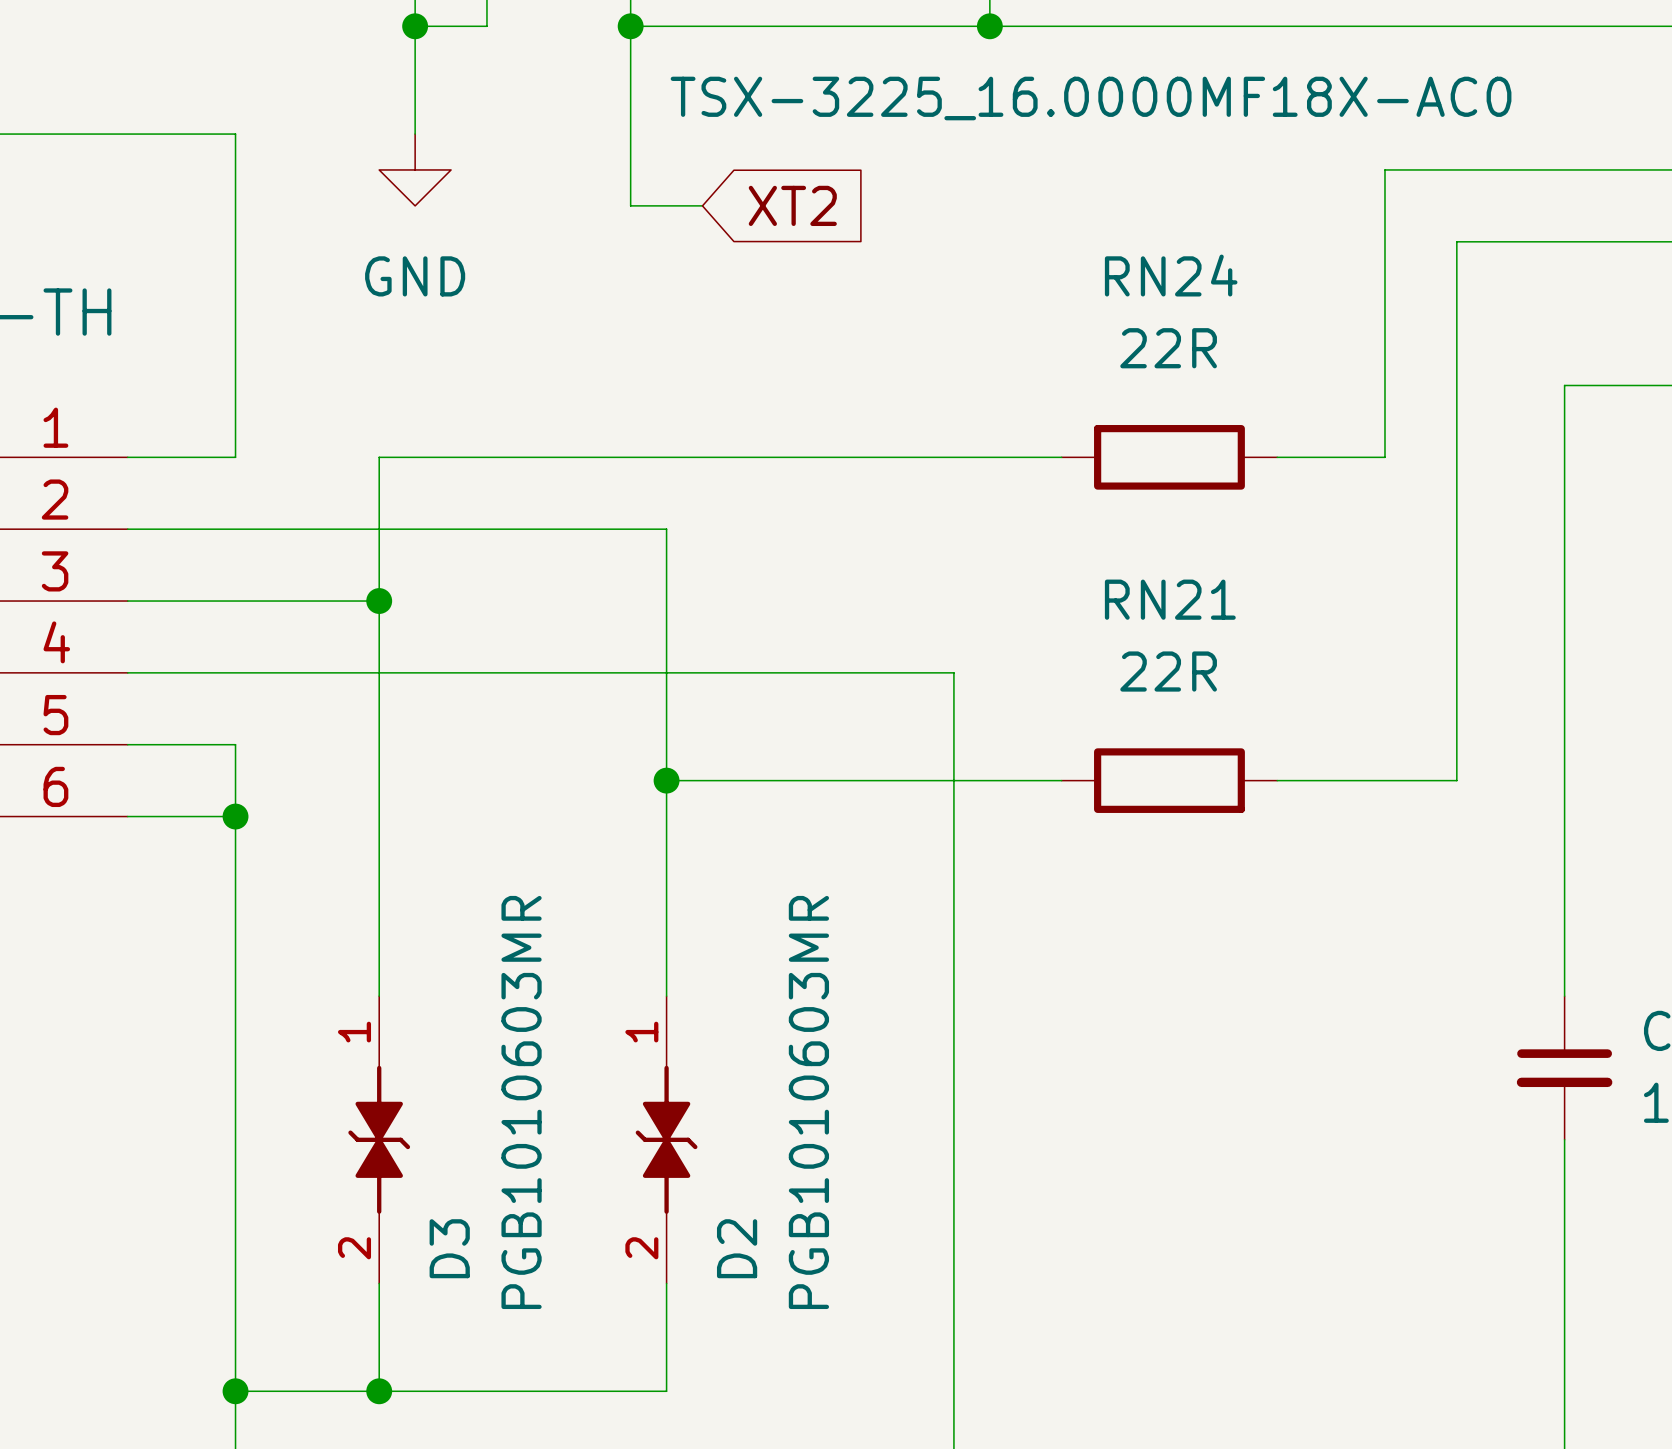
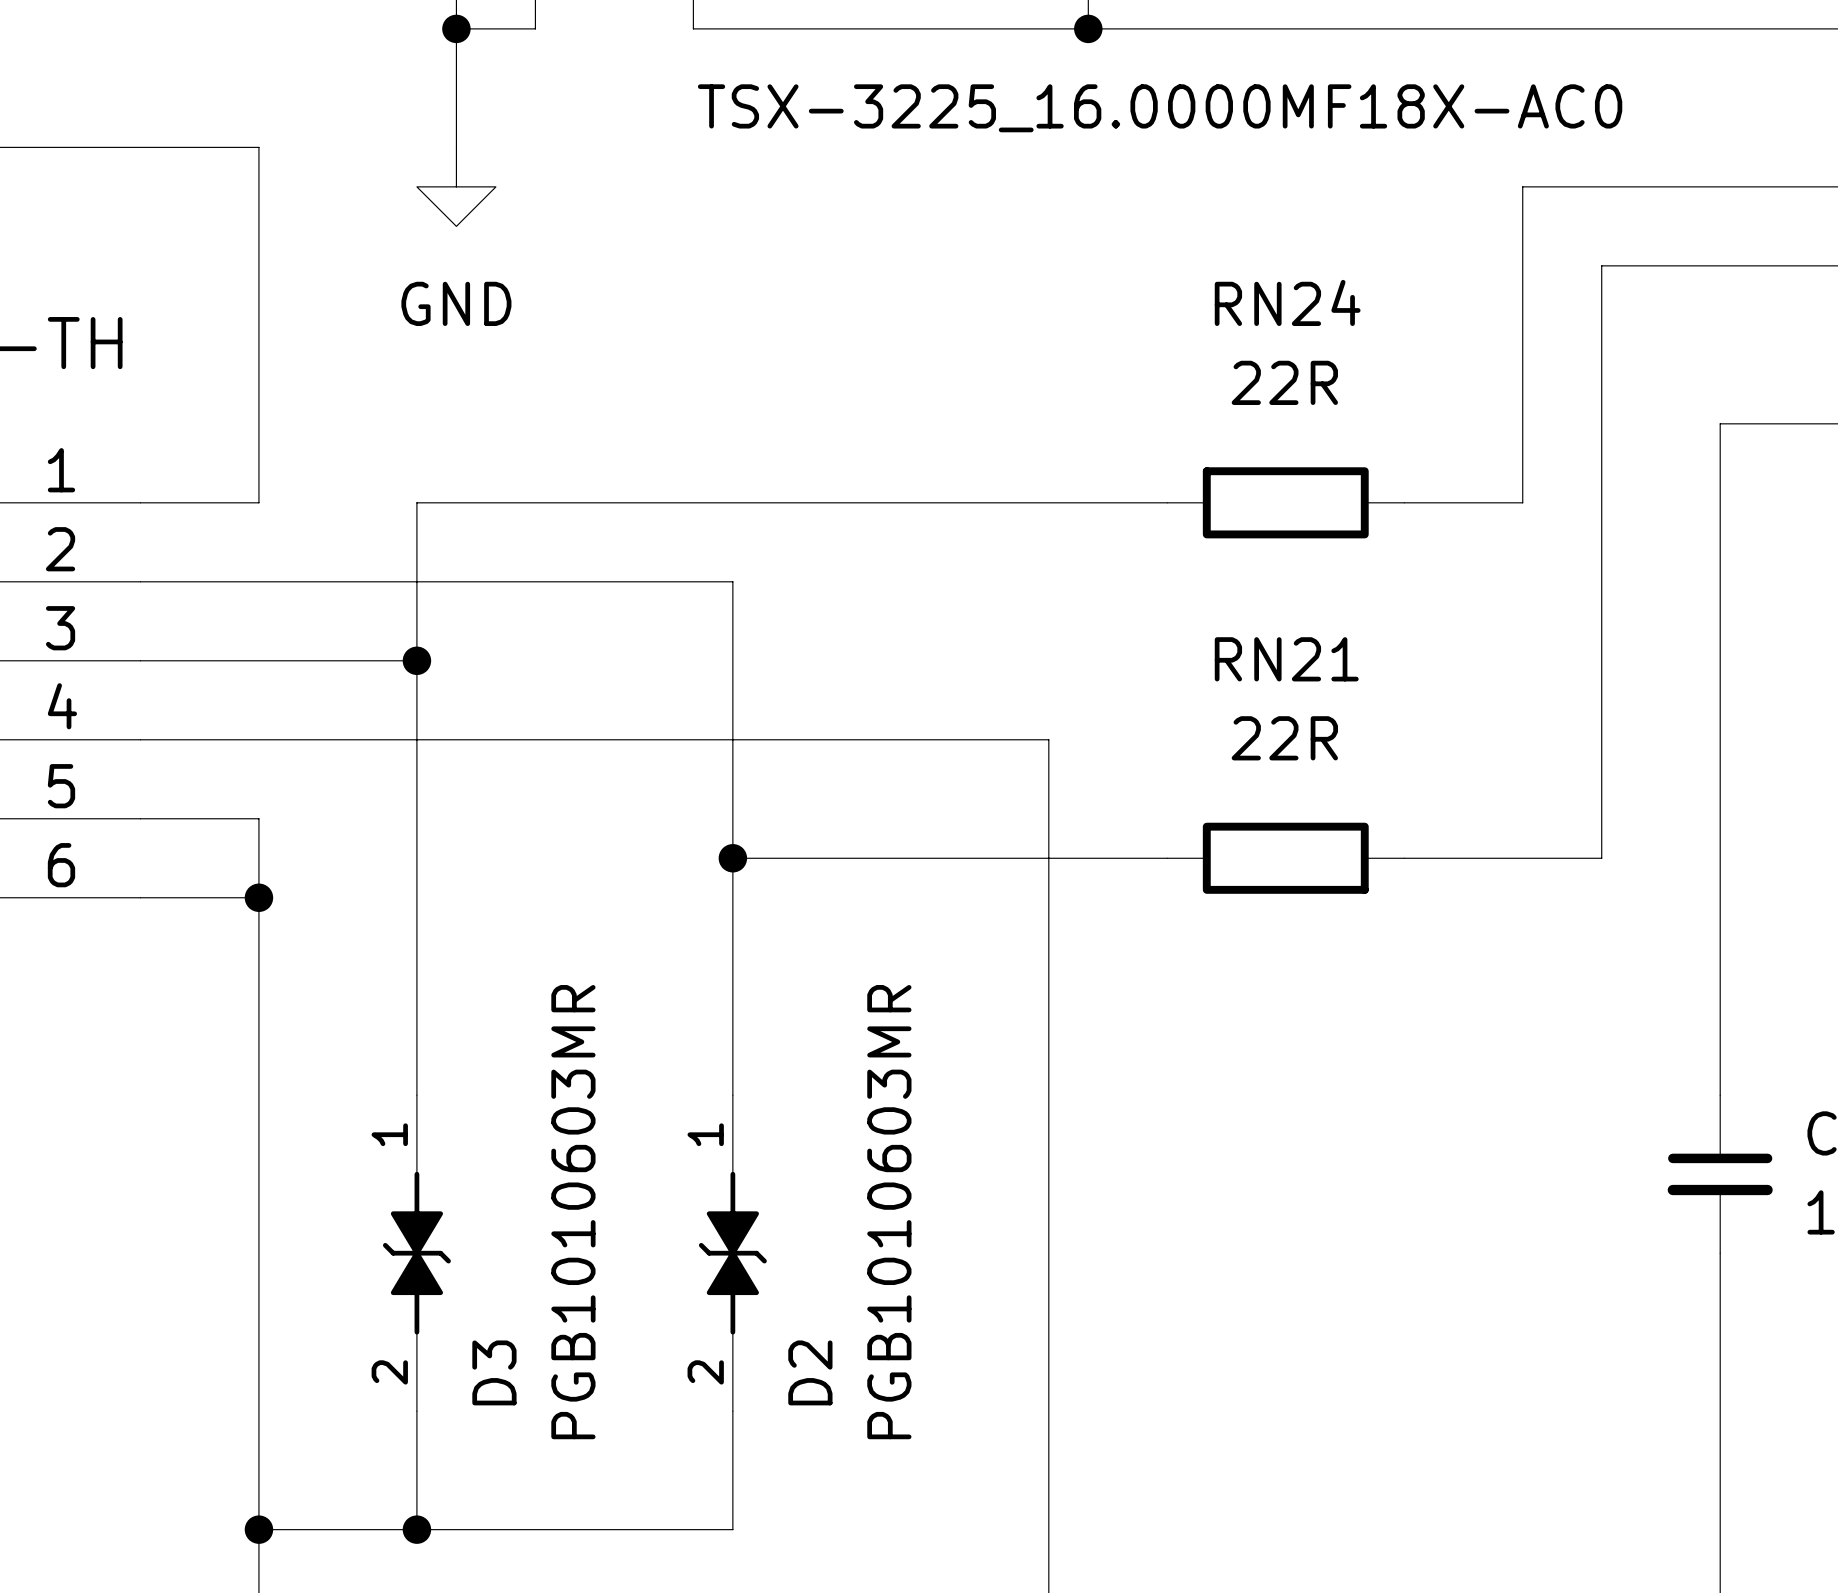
wire: (630, 26) (630, 205) (702, 205) -> none
junction: (630, 26) -> none
part value position: TSX-3225_16.0000MF18X-AC0 (1091, 98) -> TSX-3225_16.0000MF18X-AC0 (1160, 108)
global label: XT2 (792, 205) -> none

